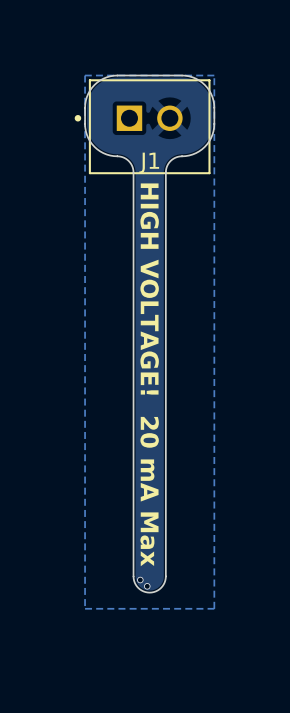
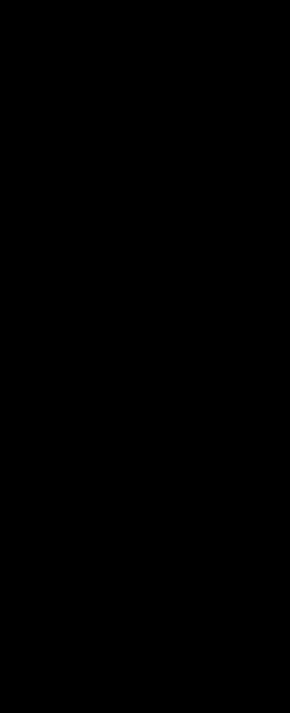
board edge: (182, 75) (117, 75) (106, 77) (92, 87) (85, 104) (85, 131) (92, 144) (103, 153) (125, 158) (131, 163) (133, 170) (133, 576) (138, 587) (149, 592) (161, 587) (165, 576) (165, 170) (168, 163) (173, 158) (192, 154) (202, 149) (209, 141) (214, 127) (214, 104) (209, 90) (199, 80) (182, 75) -> none
zone outline: (214, 75) (85, 75) (85, 608) (214, 608) (214, 75) -> none
J1: (142, 126) -> none
text: HIGH VOLTAGE! 20 mA Max (149, 374) -> none
via: (140, 580) -> none
via: (147, 586) -> none

